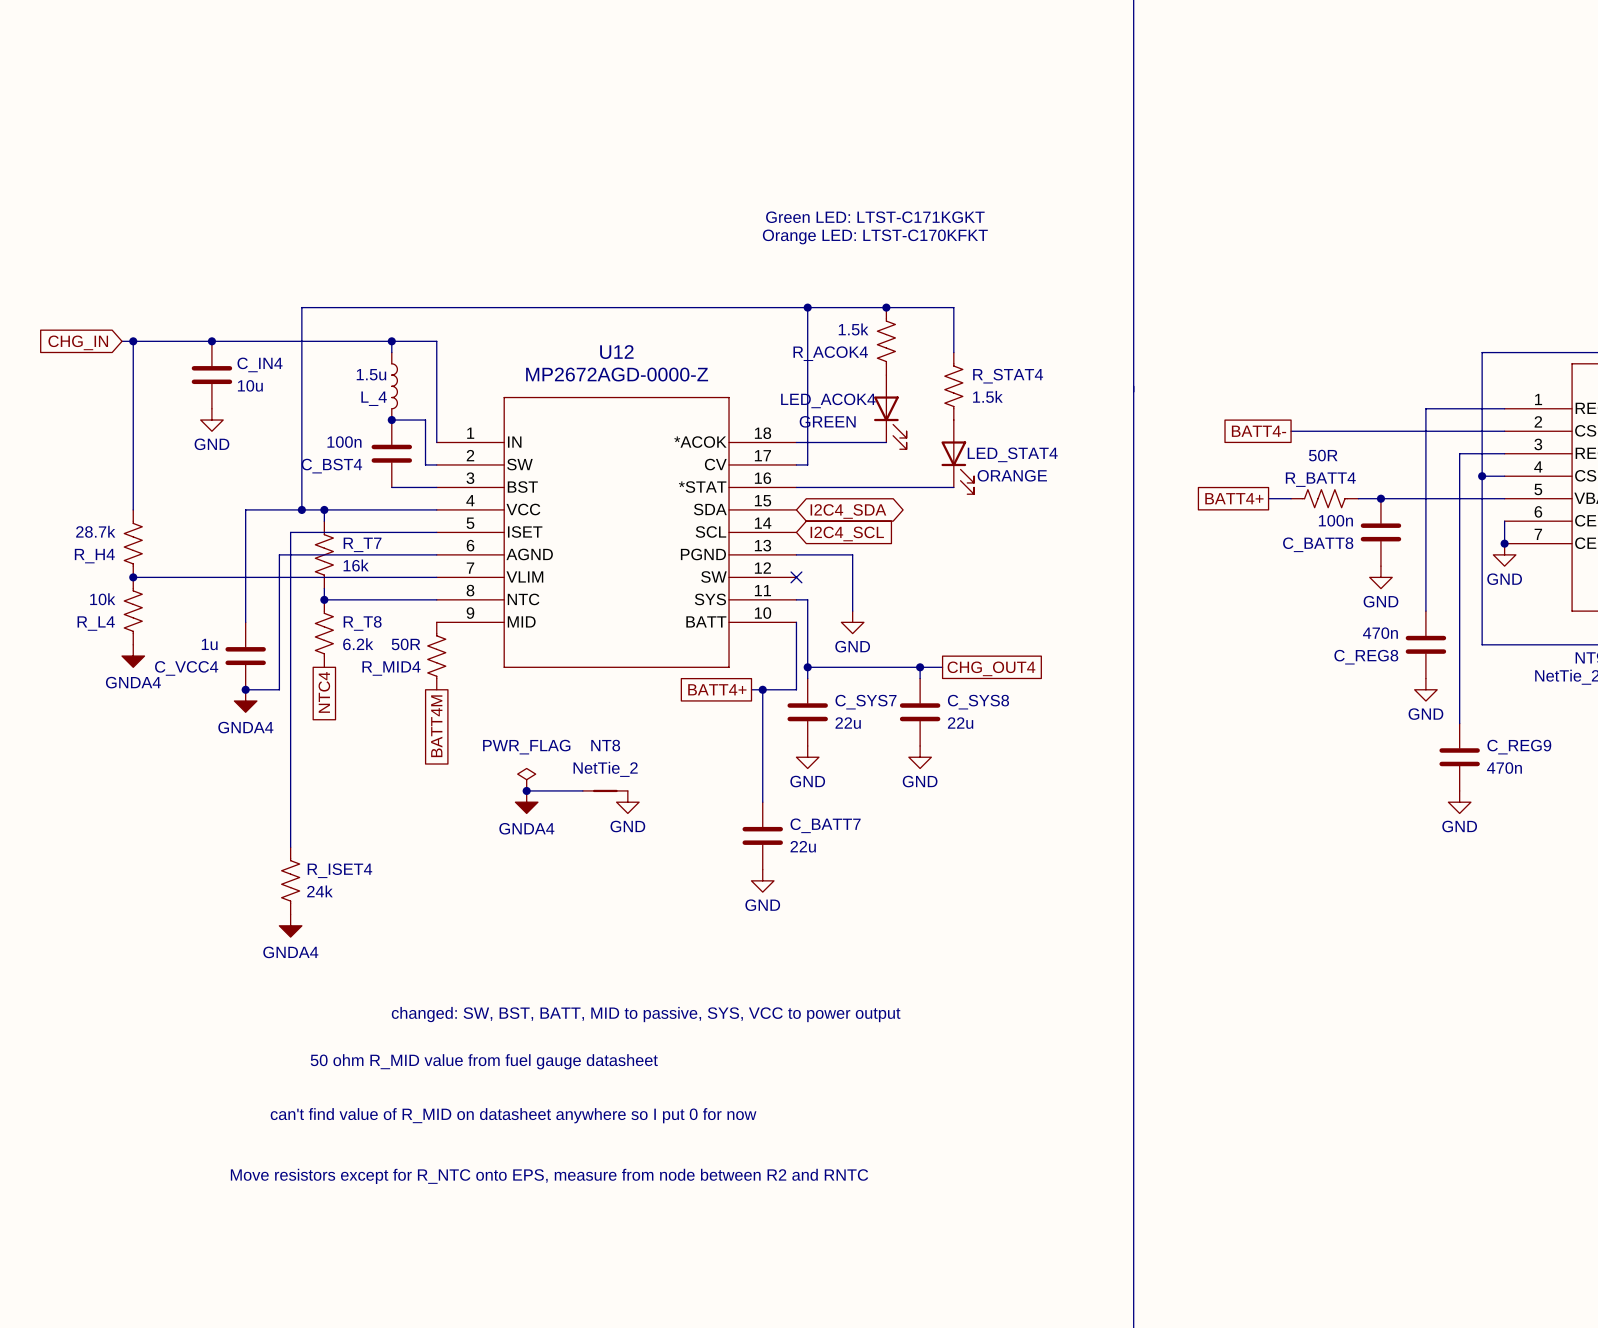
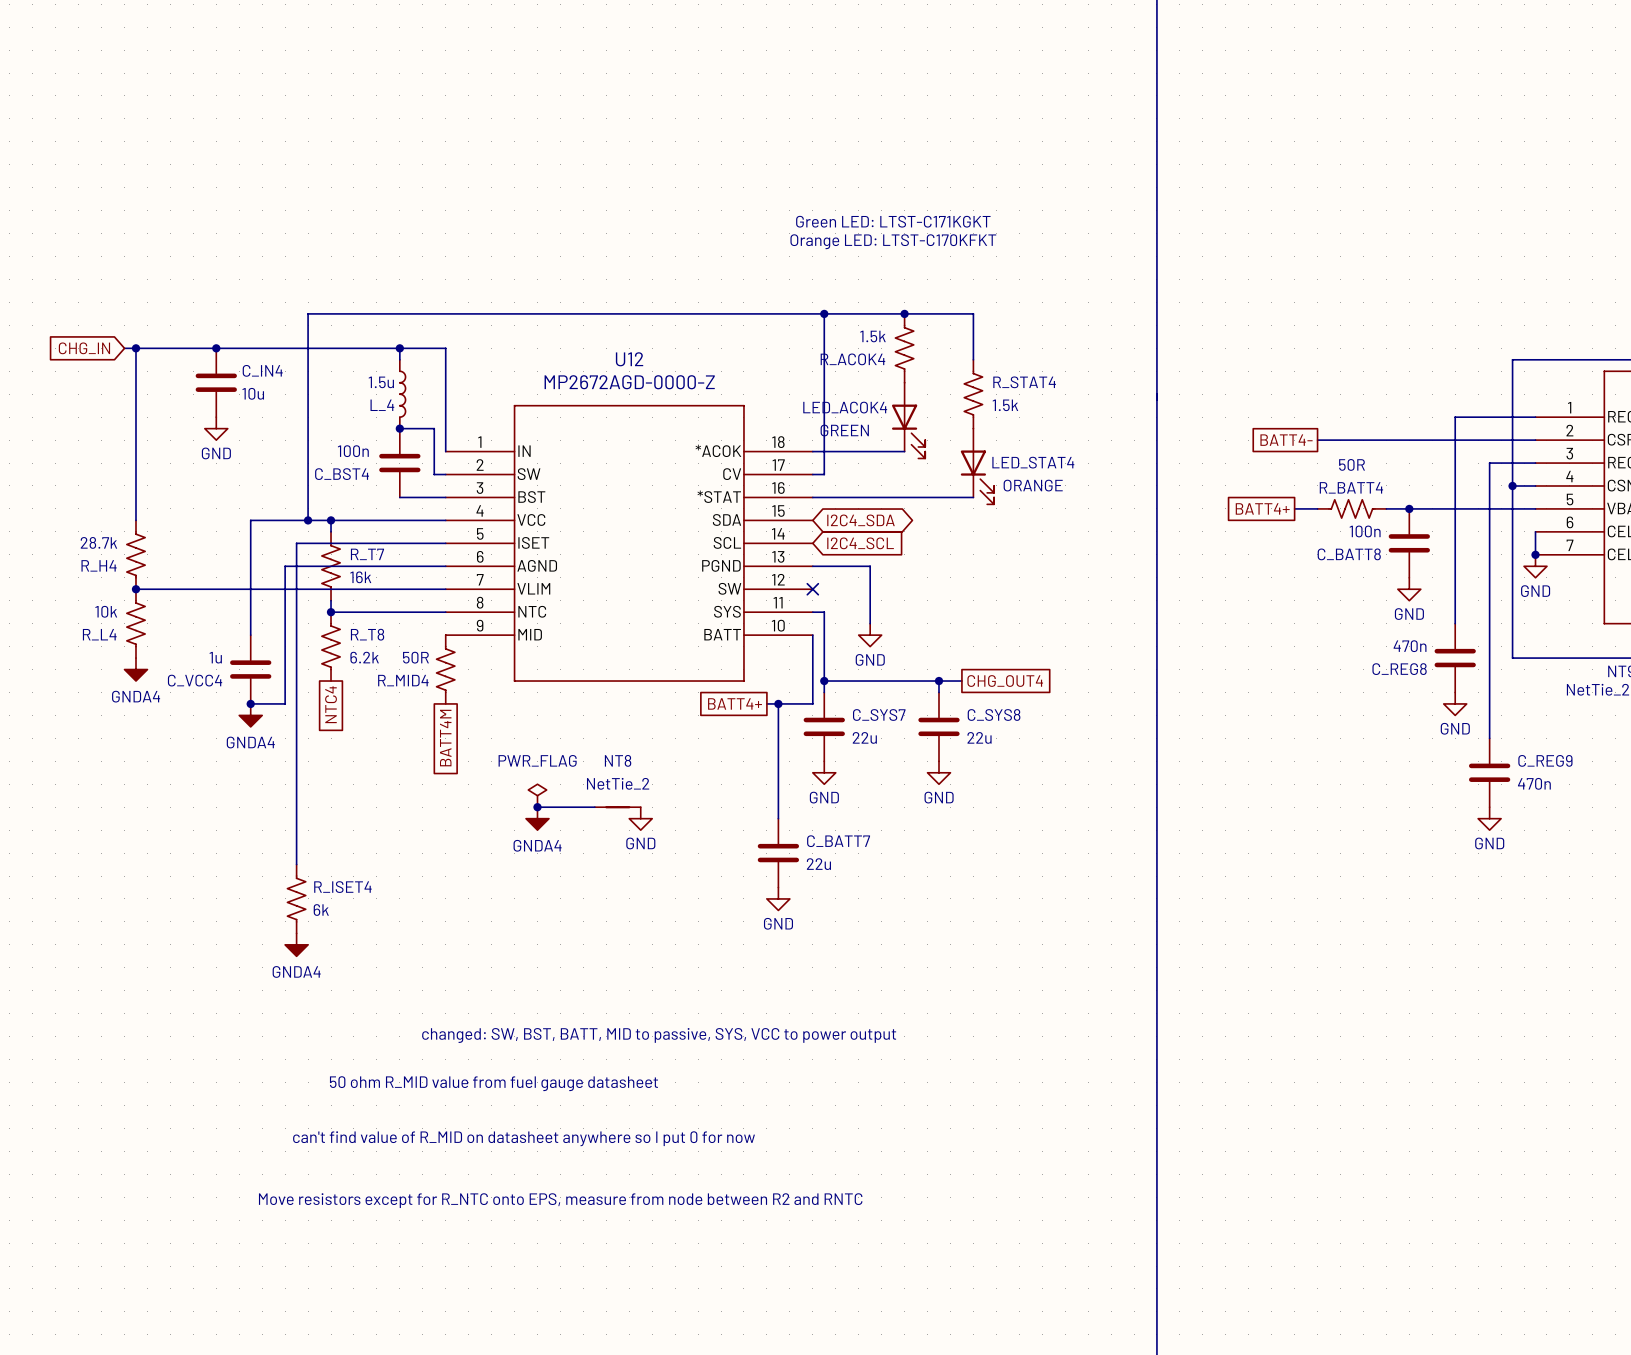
R_ISET4 value: 24k (319, 891) -> 6k (321, 910)

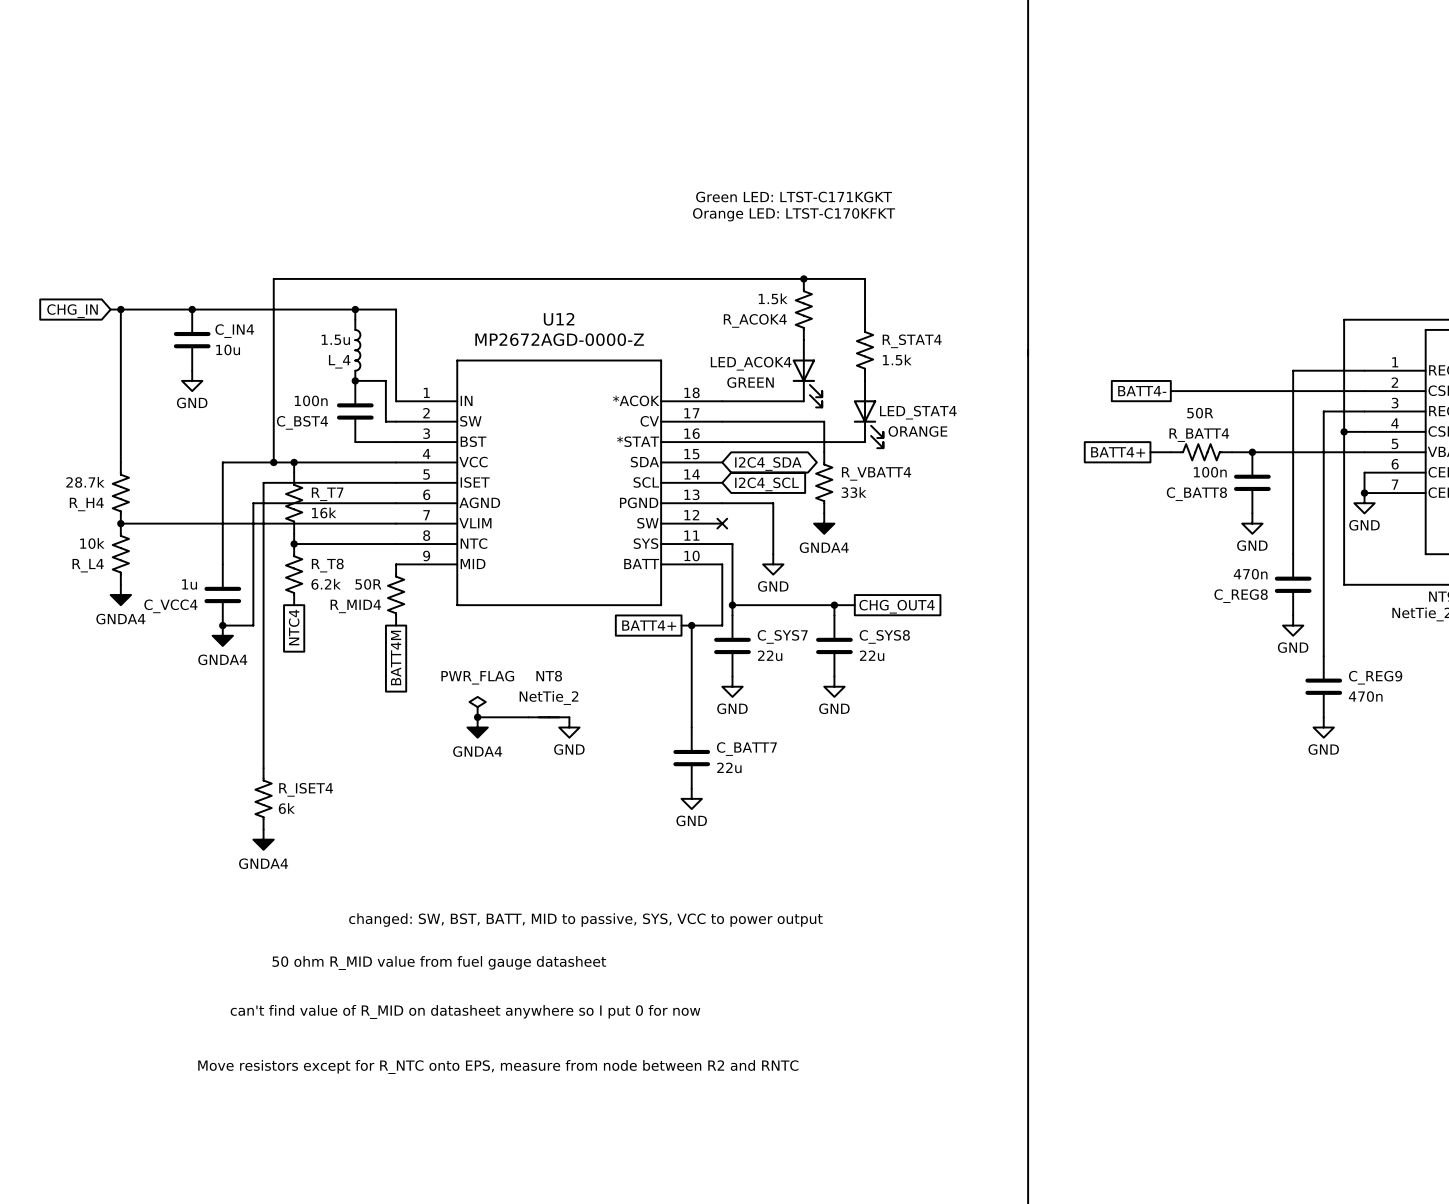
wire: (824, 313) (824, 474) -> (824, 452) (824, 421) (732, 421)
junction: (824, 313) -> none
R_VBATT4: none -> 33k (824, 482)
power symbol: none -> GNDA4 (824, 523)

